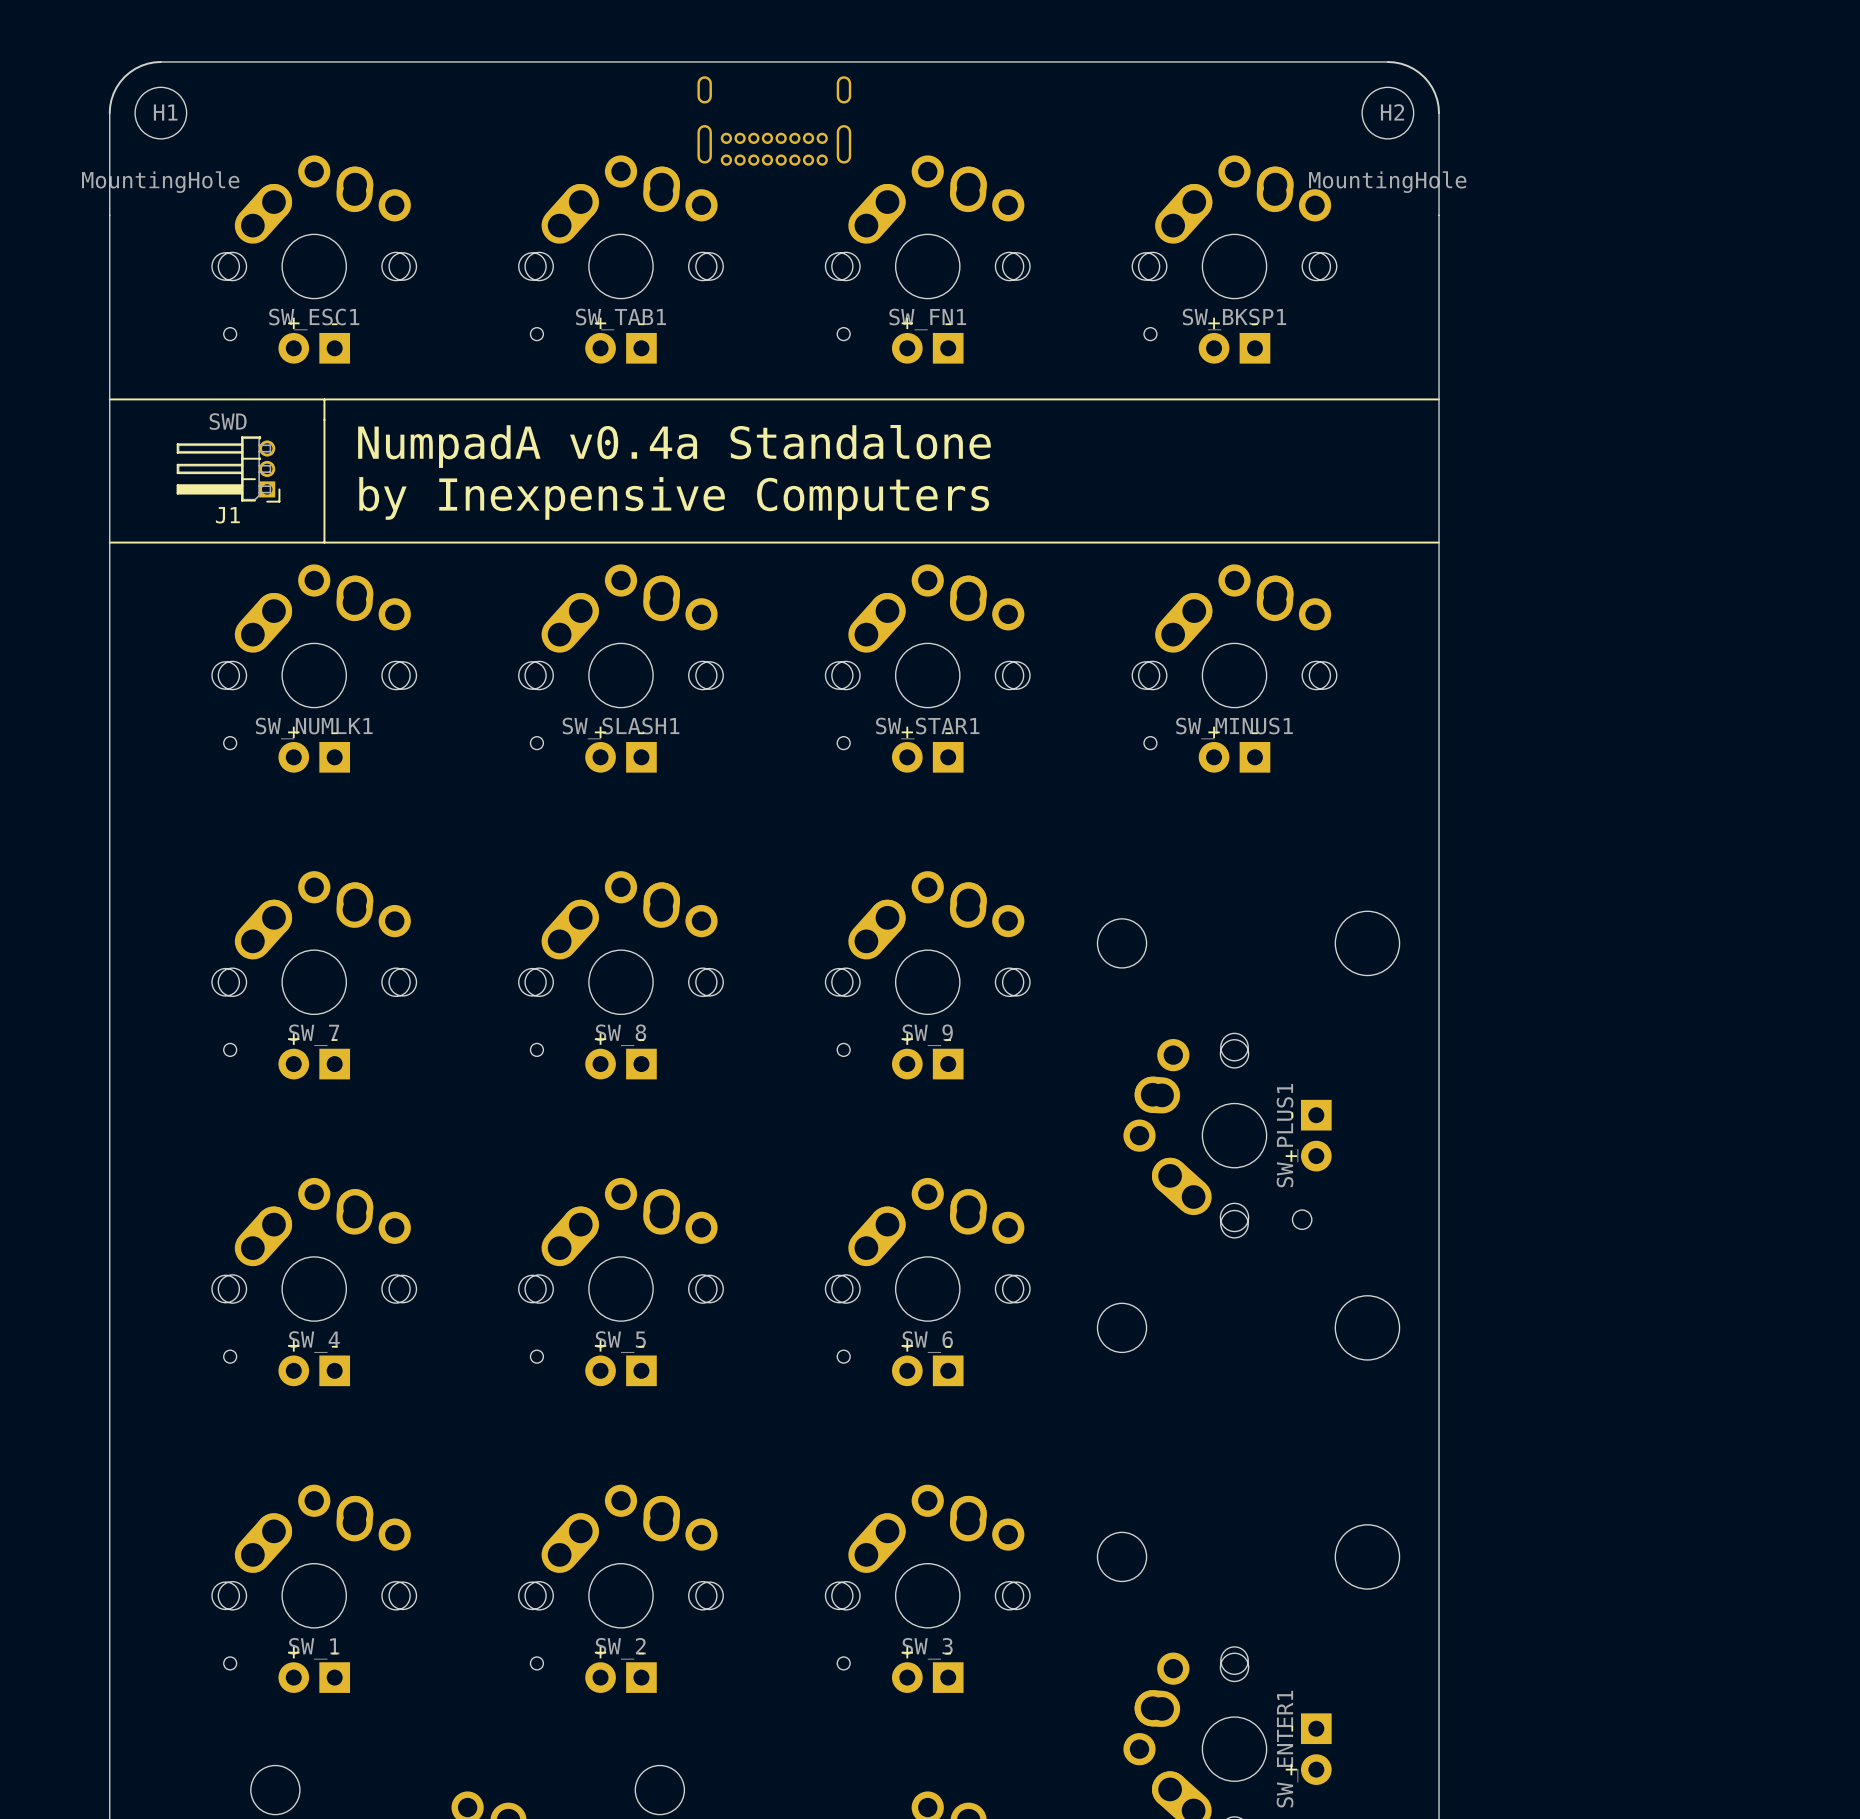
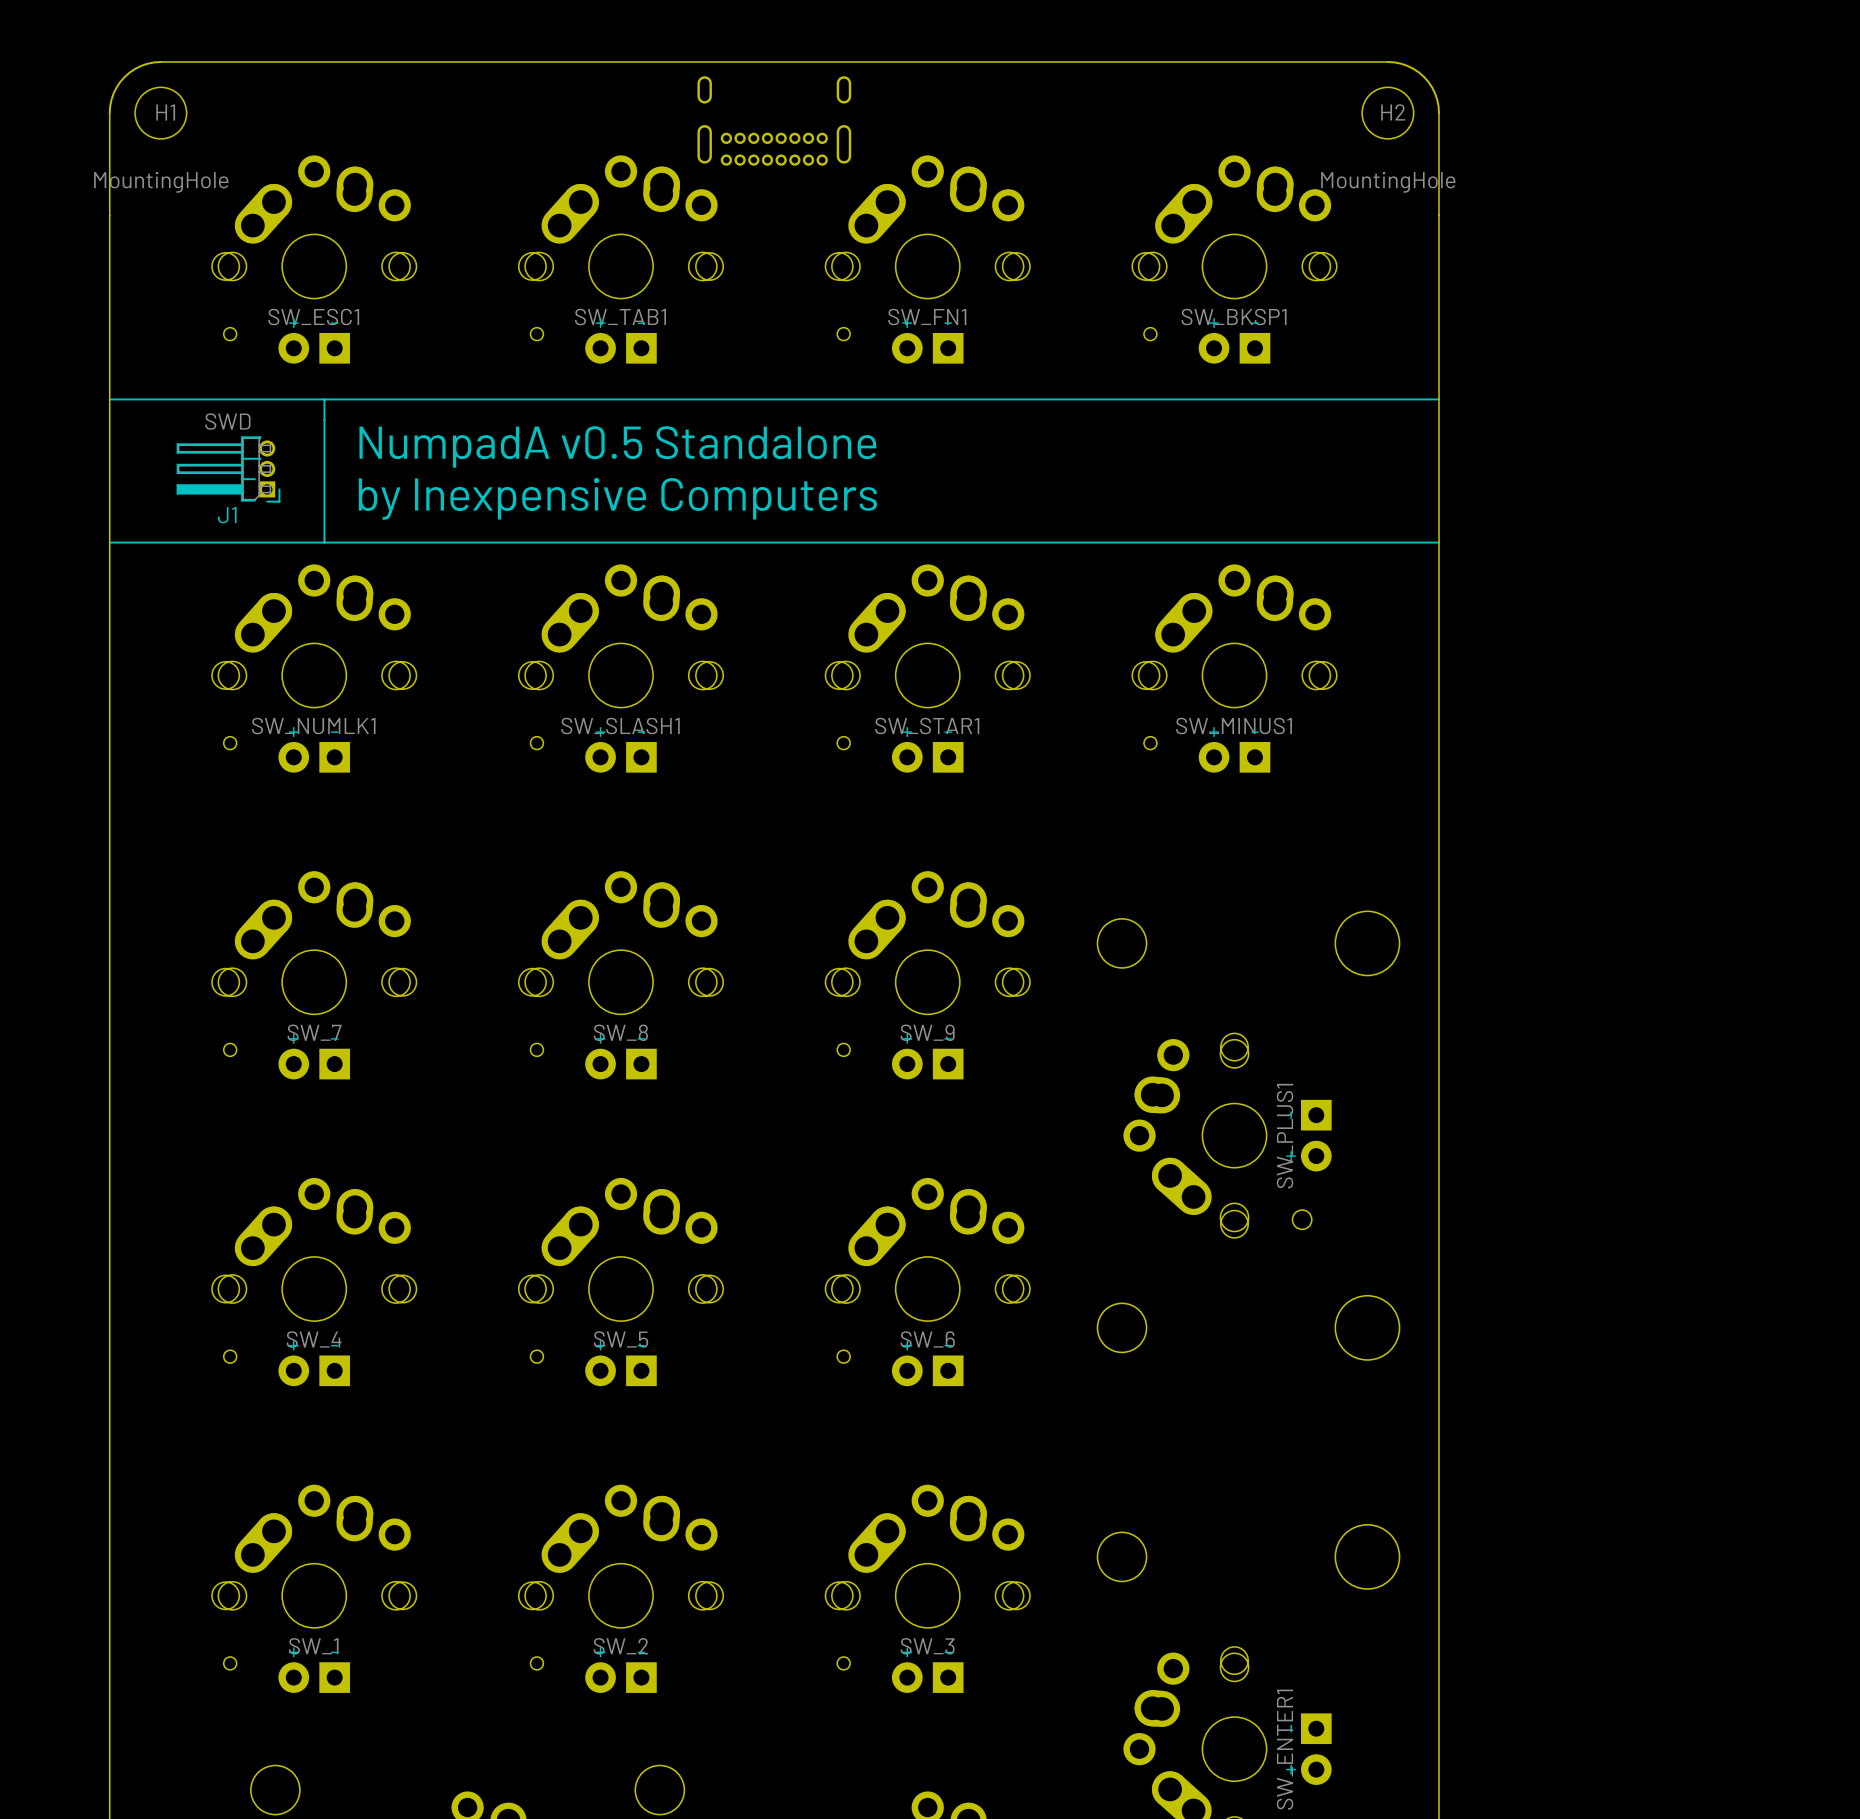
text: NumpadA v0.4a Standalone (674, 446) -> NumpadA v0.5 Standalone (617, 446)

